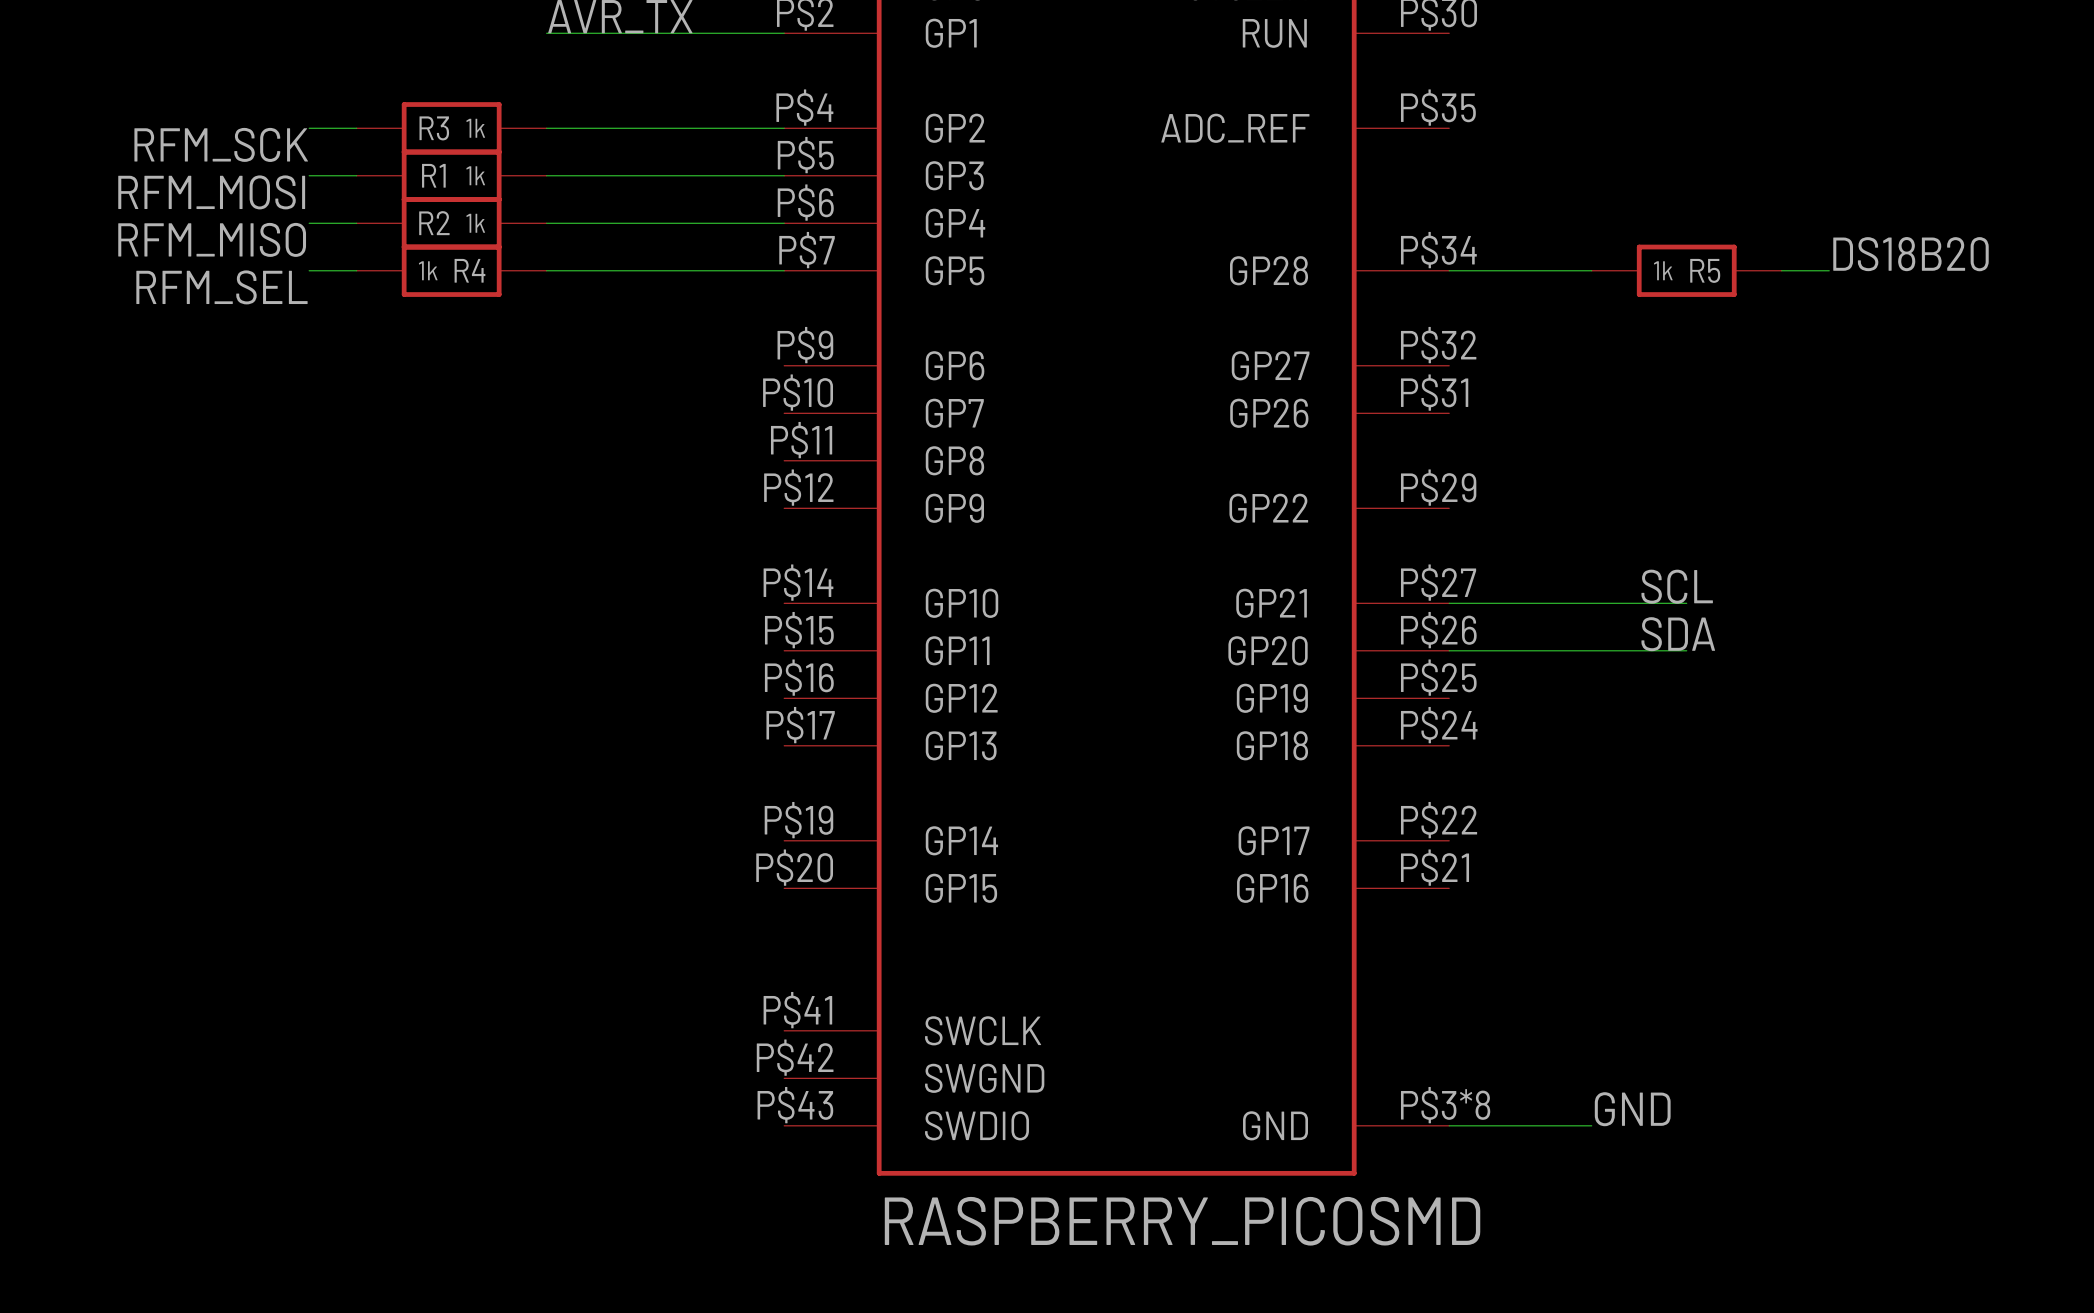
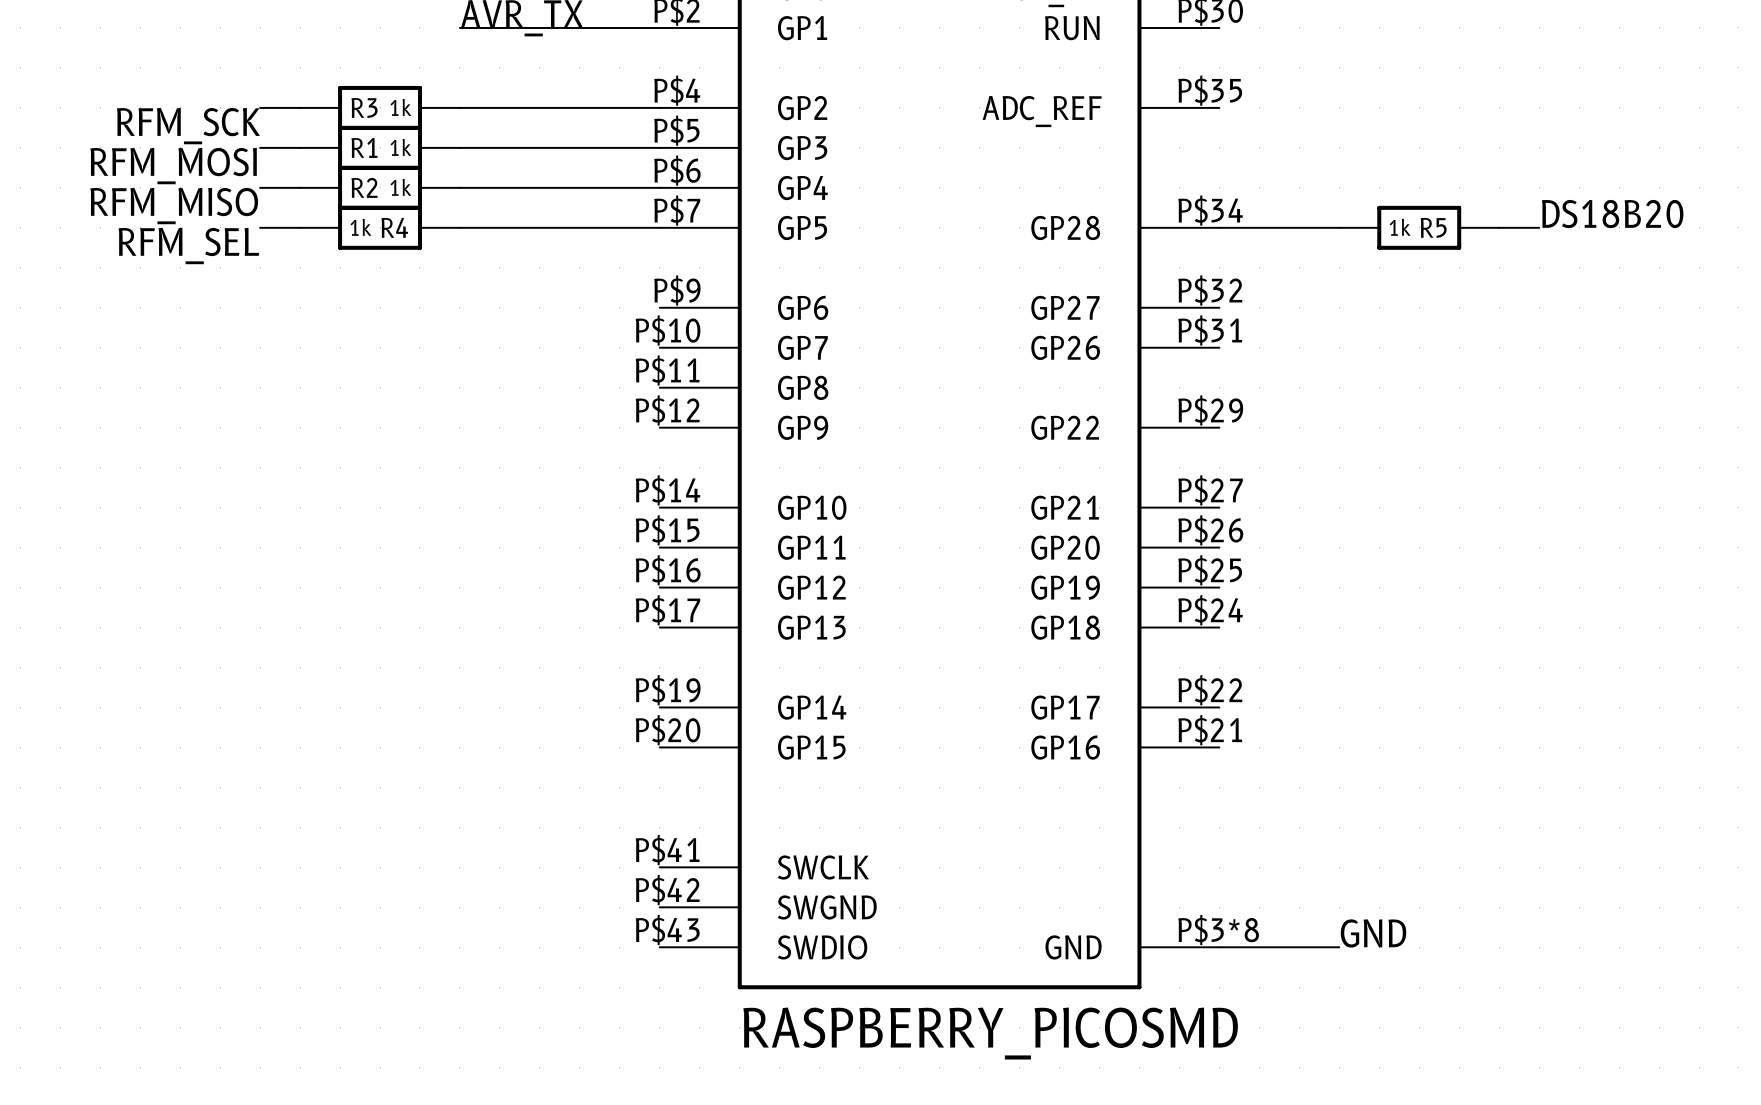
label: SCL (1677, 586) -> none
wire: (1449, 603) (1686, 603) -> none
label: SDA (1678, 634) -> none
wire: (1449, 650) (1686, 650) -> none

